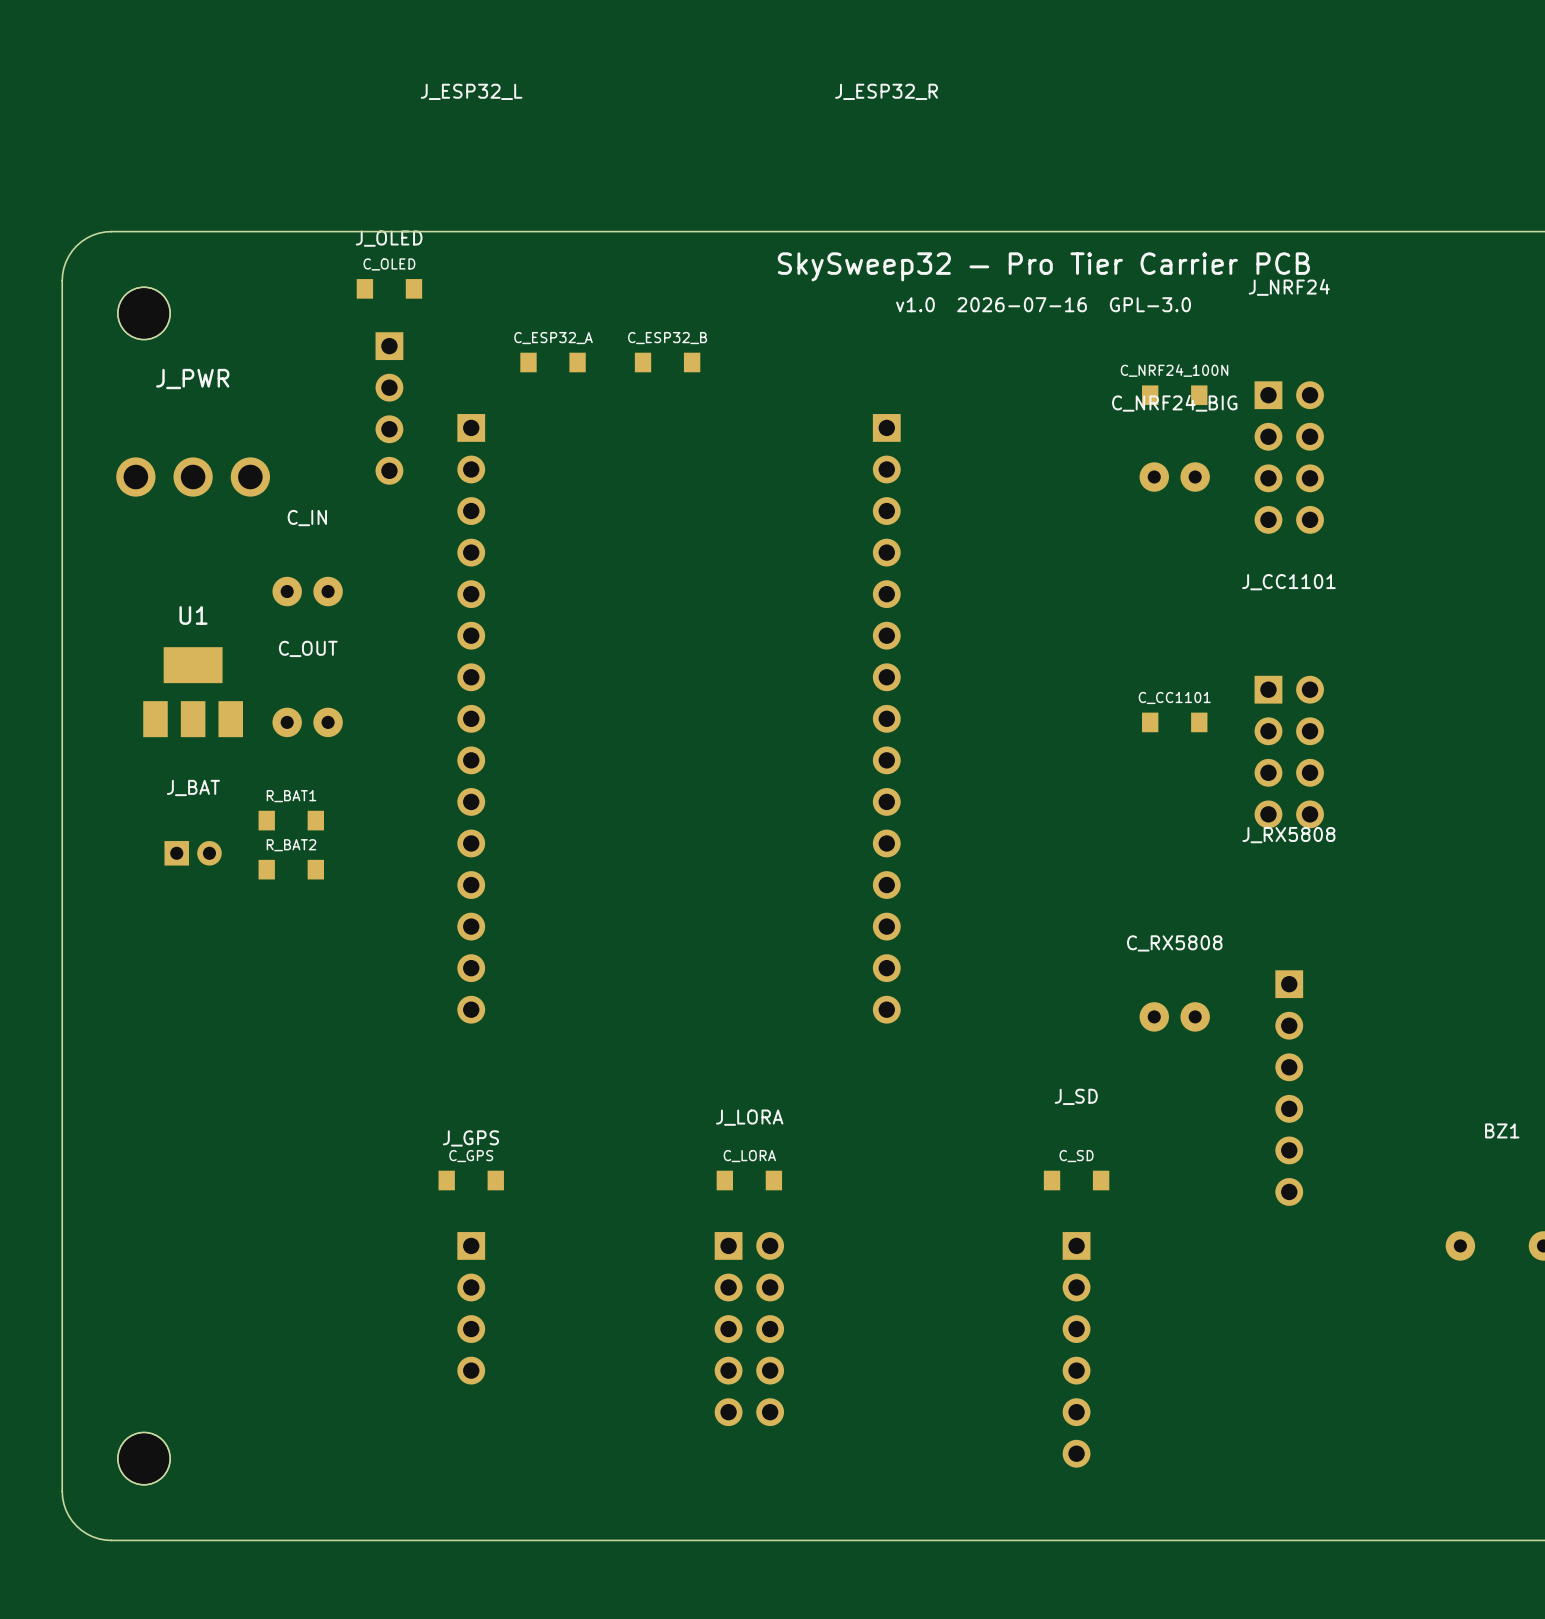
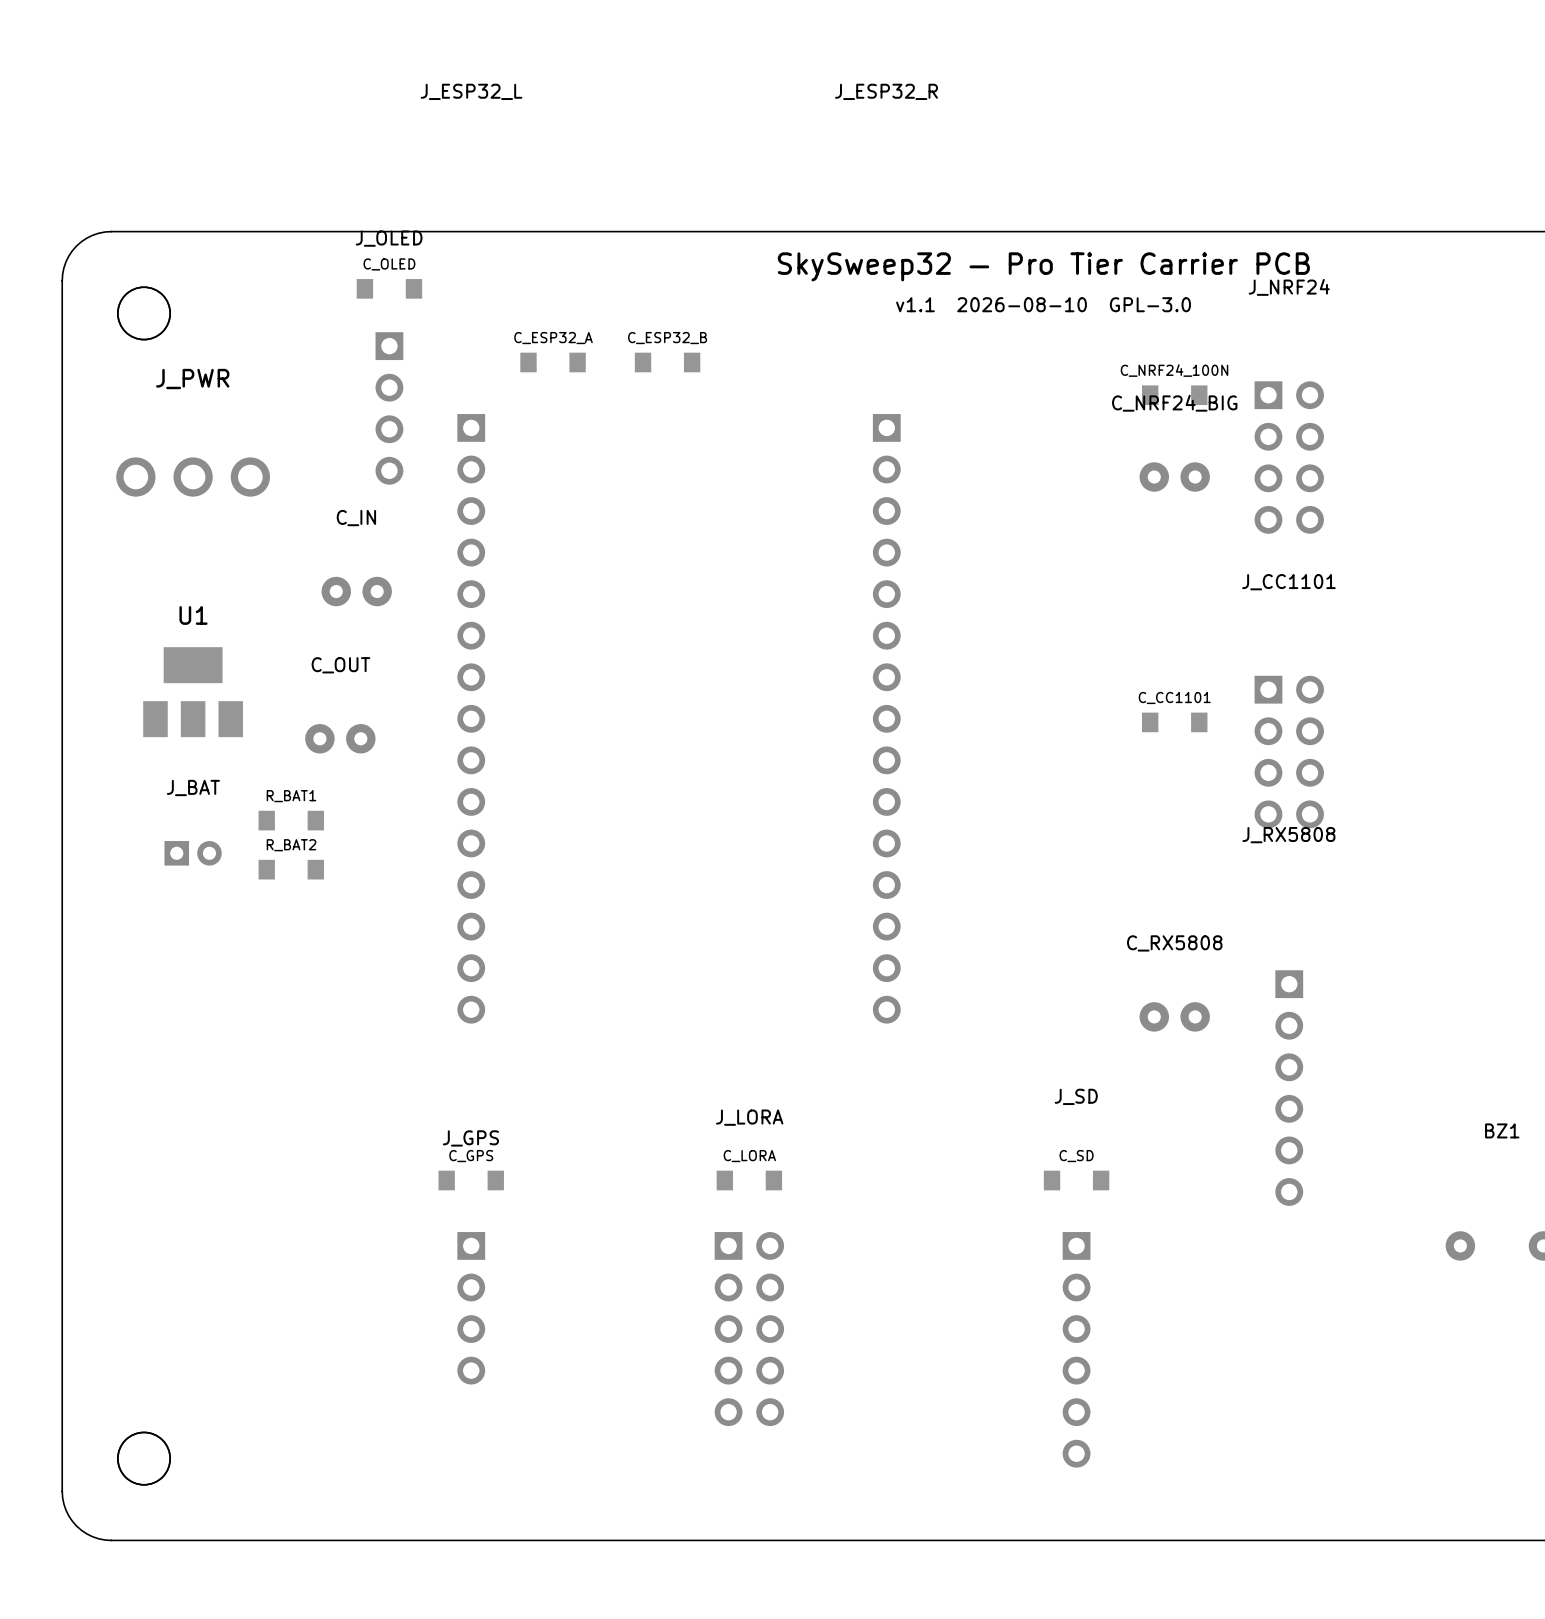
text: v1.0 2026-07-16 GPL-3.0 (1043, 304) -> v1.1 2026-08-10 GPL-3.0 (1043, 304)
C_IN position: (307, 591) -> (356, 591)
C_OUT position: (307, 722) -> (340, 738)

